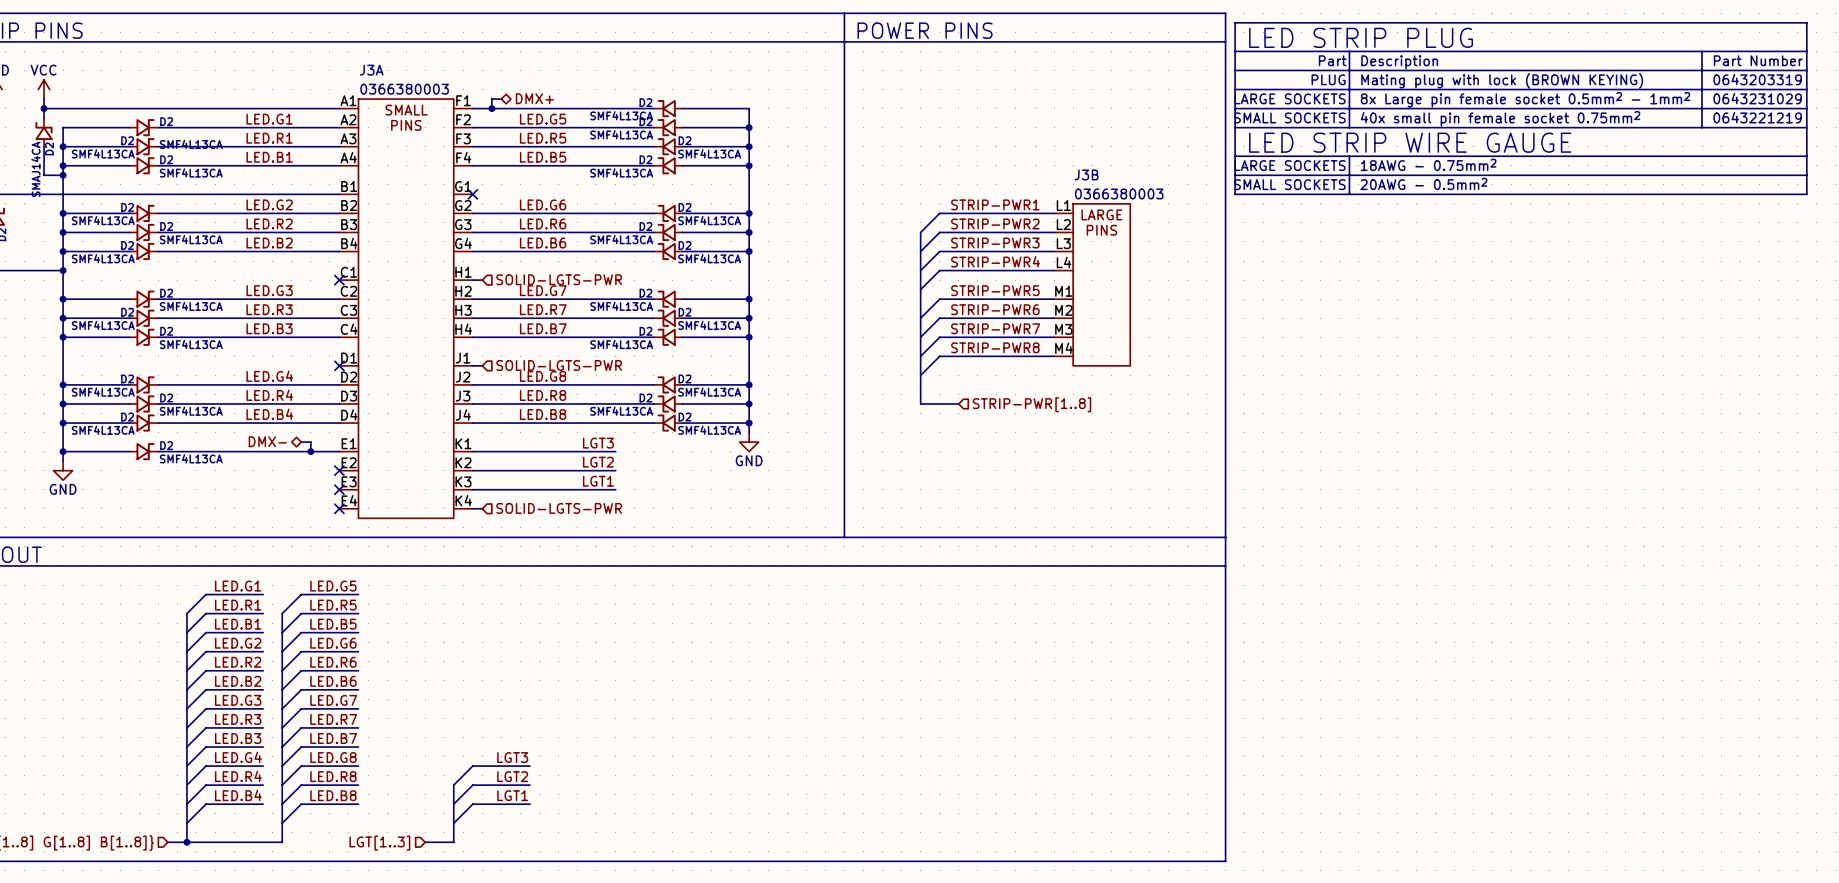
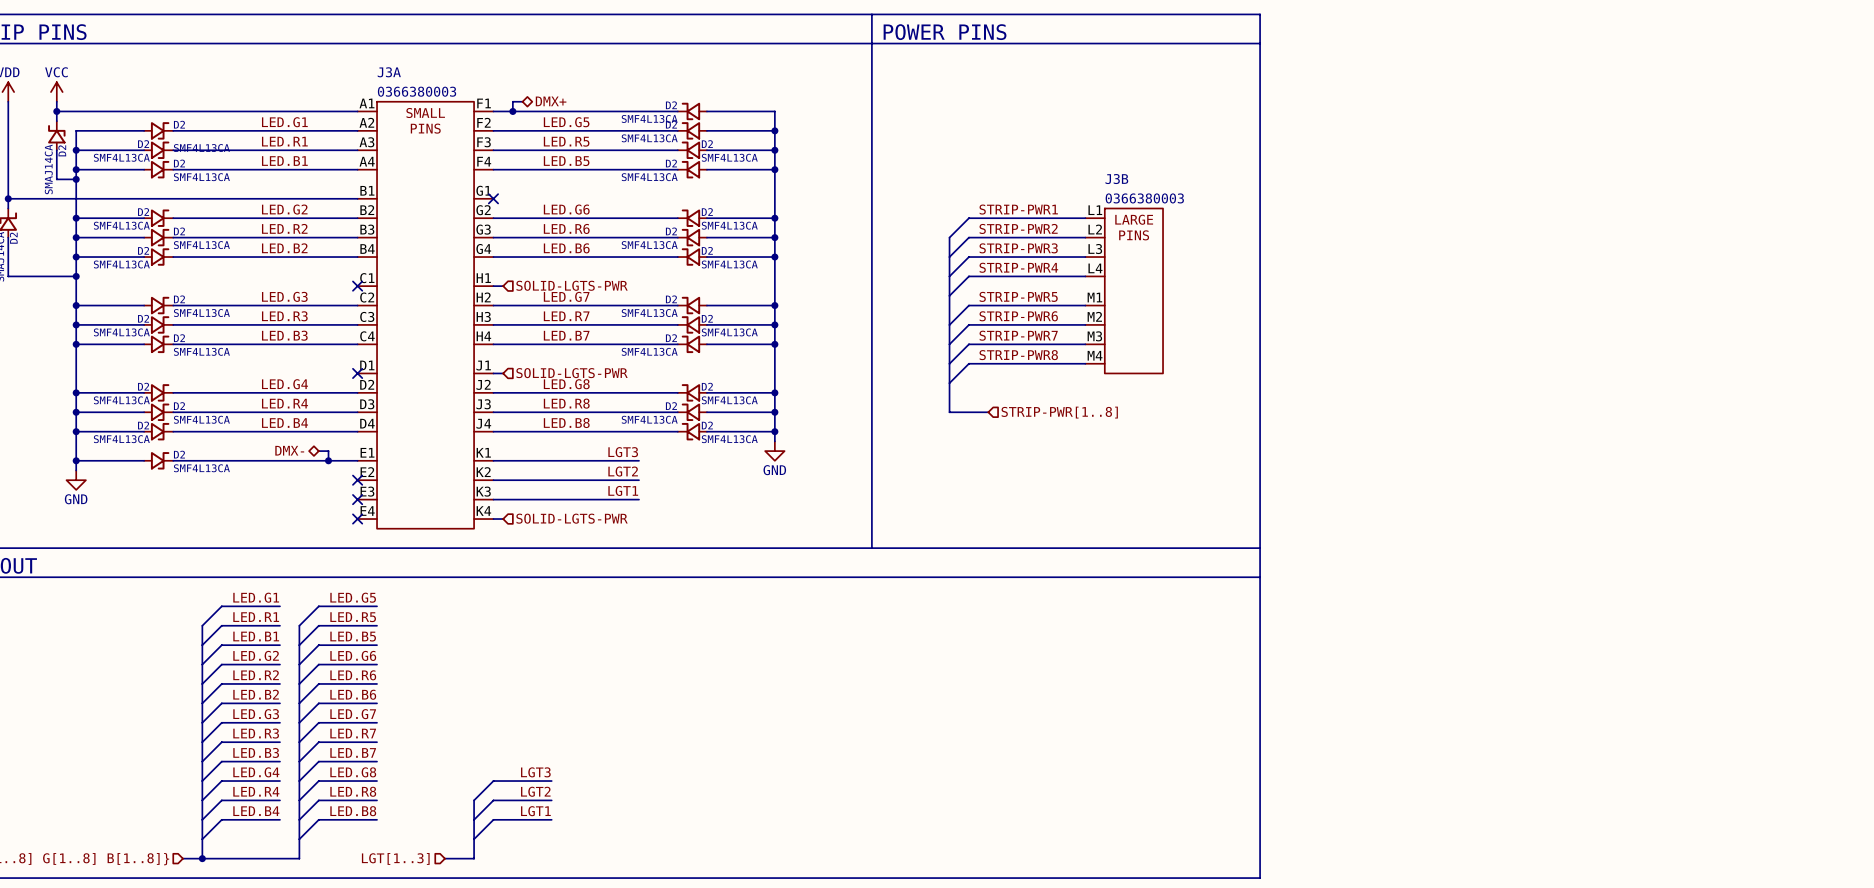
line: (1235, 22) (1235, 194) (1806, 194) (1806, 22) (1235, 22) -> none
text: LED STRIP PLUG (1361, 37) -> none
line: (1235, 51) (1806, 51) -> none
line: (1349, 51) (1349, 127) -> none
line: (1702, 51) (1702, 127) -> none
text: Part (1332, 60) -> none
text: Part Number (1758, 60) -> none
text: Description (1399, 62) -> none
line: (1235, 70) (1806, 70) -> none
text: PLUG (1328, 79) -> none
text: 0643203319 (1757, 79) -> none
text: Mating plug with lock (BROWN KEYING) (1502, 80) -> none
line: (1235, 89) (1806, 89) -> none
text: LARGE SOCKETS (1290, 98) -> none
text: 0643231029 (1757, 98) -> none
text: 8x Large pin female socket 0.5mm2 - 1mm2 (1525, 99) -> none
line: (1235, 108) (1806, 108) -> none
text: SMALL SOCKETS (1289, 117) -> none
text: 0643221219 (1757, 117) -> none
text: 40x small pin female socket 0.75mm2 (1500, 118) -> none
line: (1235, 127) (1806, 127) -> none
text: LED STRIP WIRE GAUGE (1410, 142) -> none
line: (1235, 156) (1806, 156) -> none
line: (1349, 156) (1349, 194) -> none
text: 18AWG - 0.75mm2 (1428, 164) -> none
text: LARGE SOCKETS (1290, 165) -> none
line: (1235, 175) (1806, 175) -> none
text: 20AWG - 0.5mm2 (1423, 183) -> none
text: SMALL SOCKETS (1289, 184) -> none

